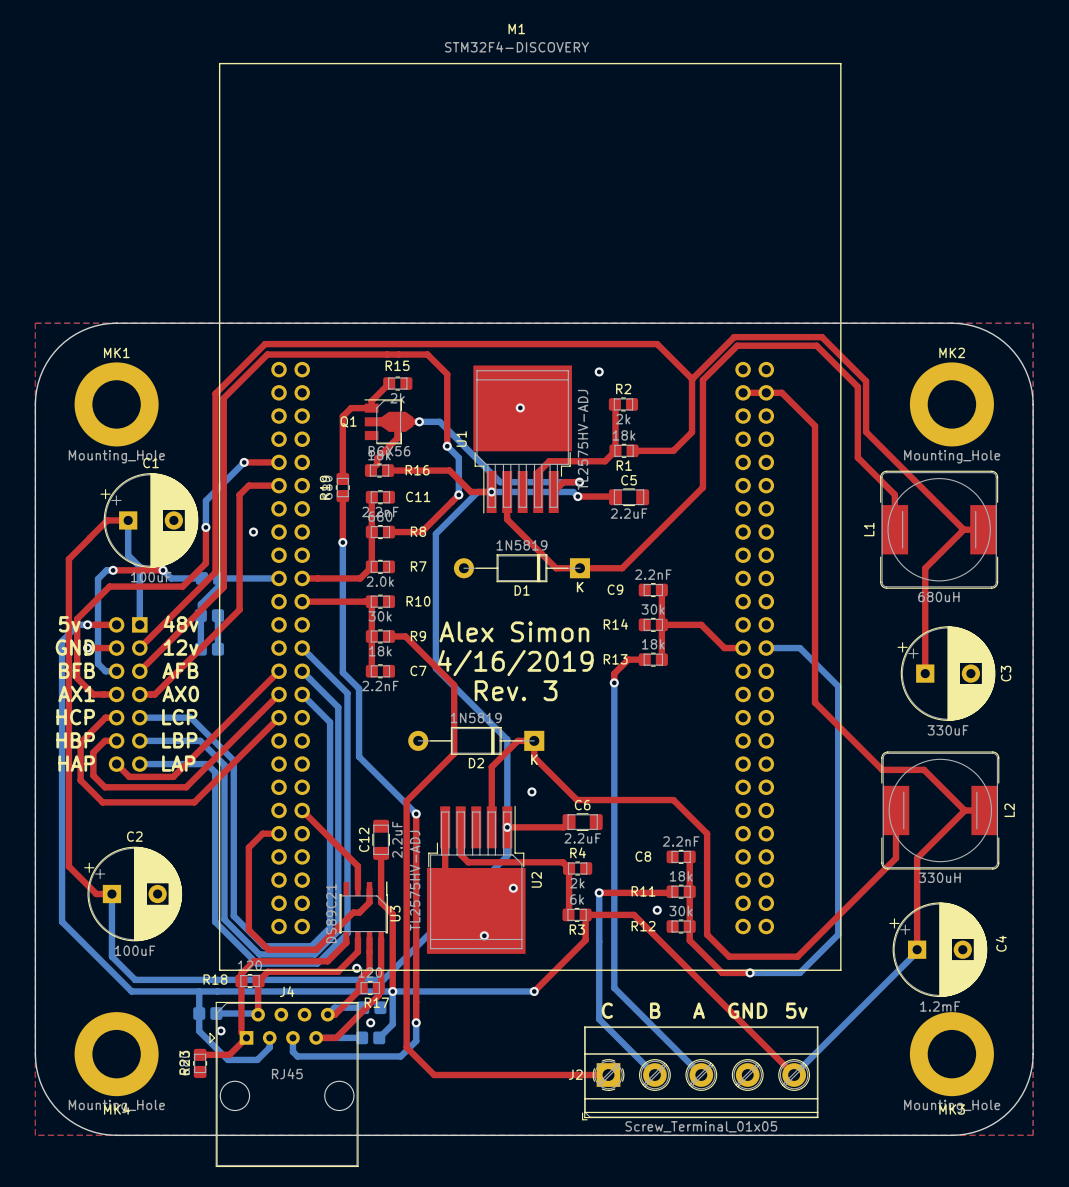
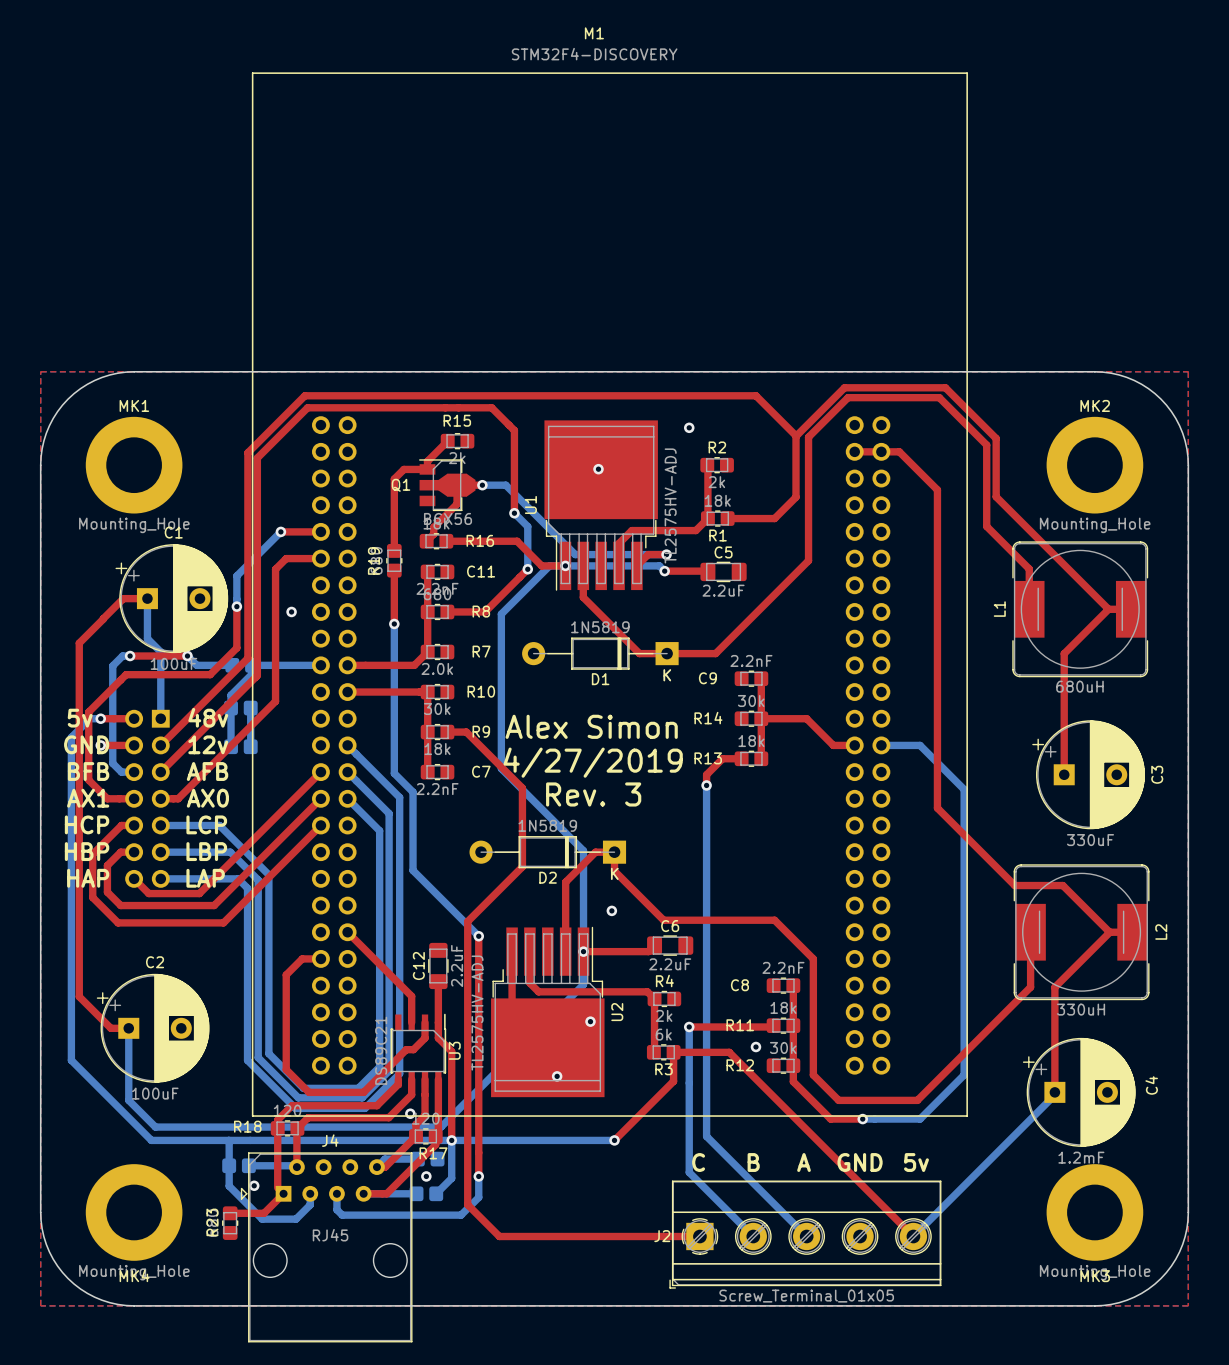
text: 4/16/2019 (515, 663) -> 4/27/2019 (593, 762)

